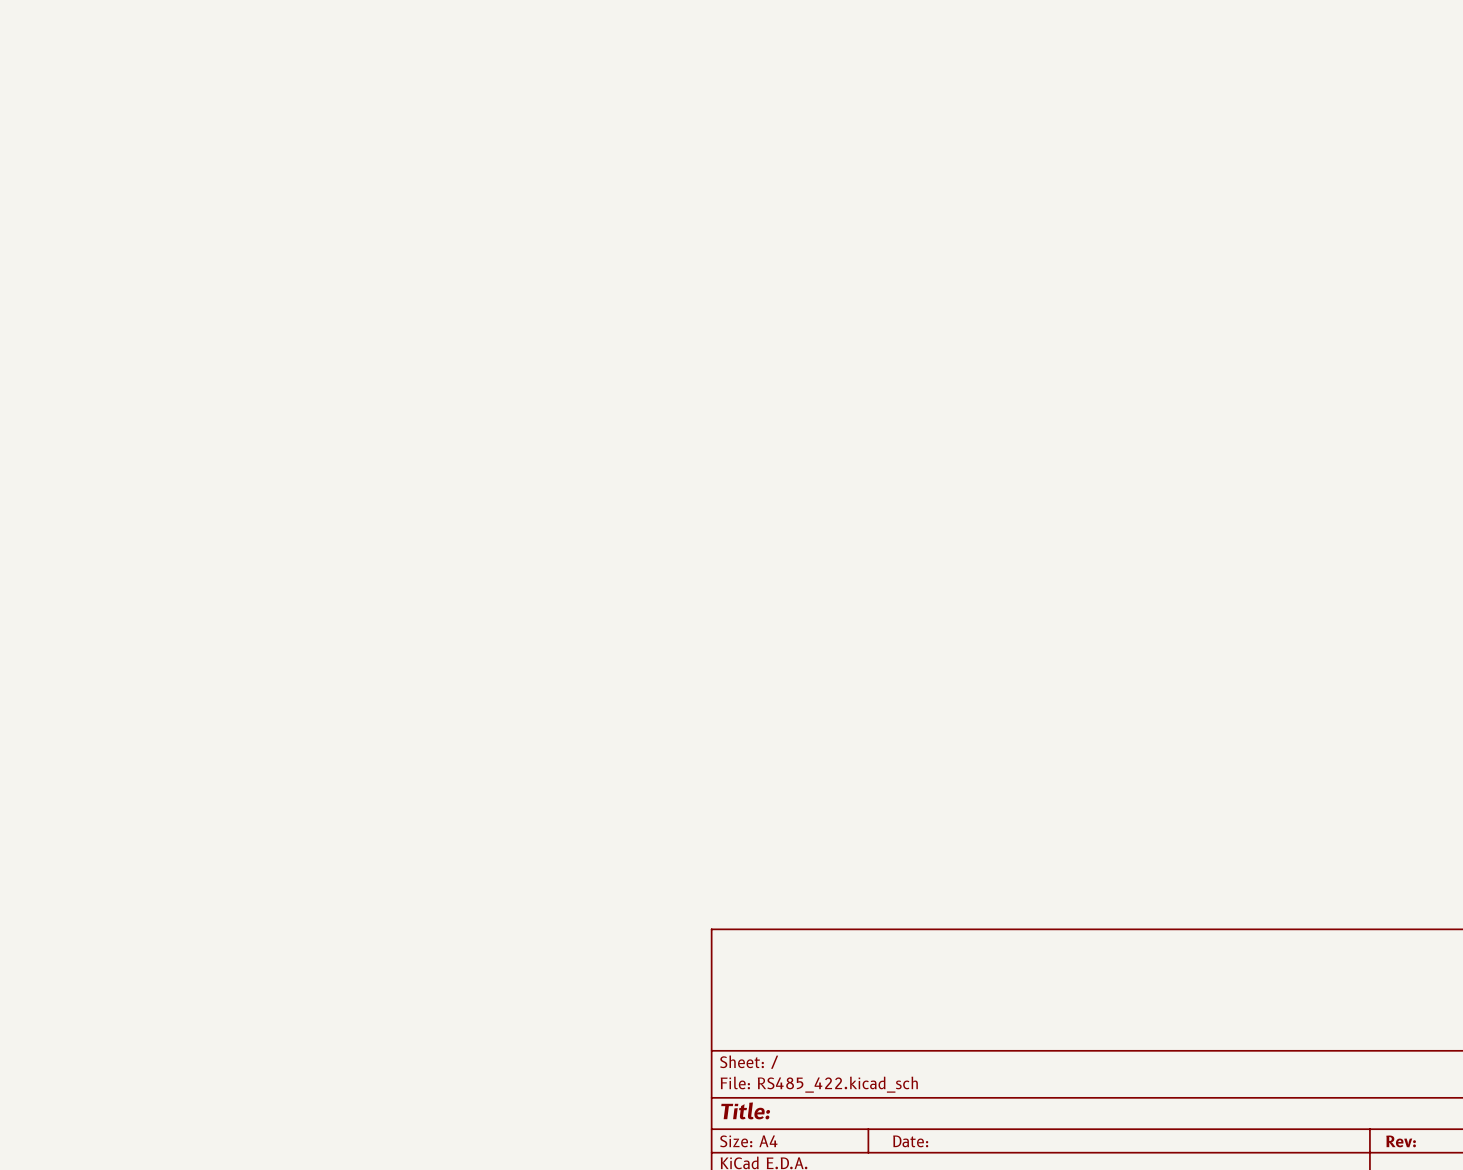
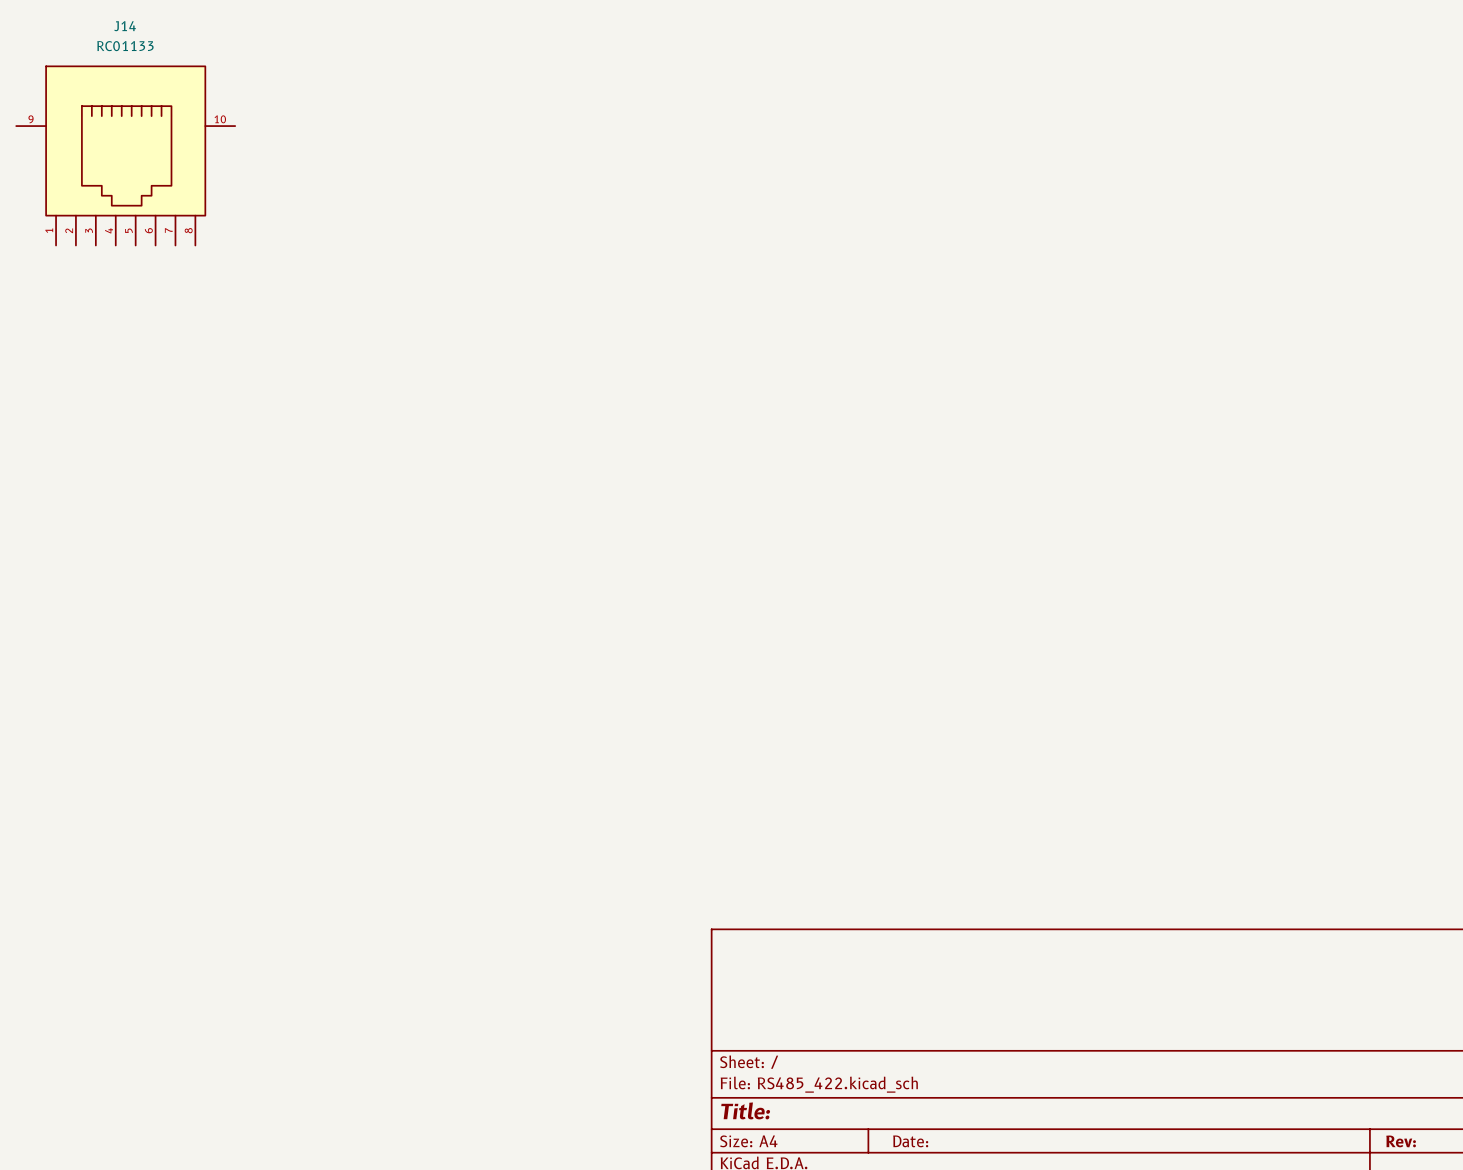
J14: none -> RC01133 (125, 155)

